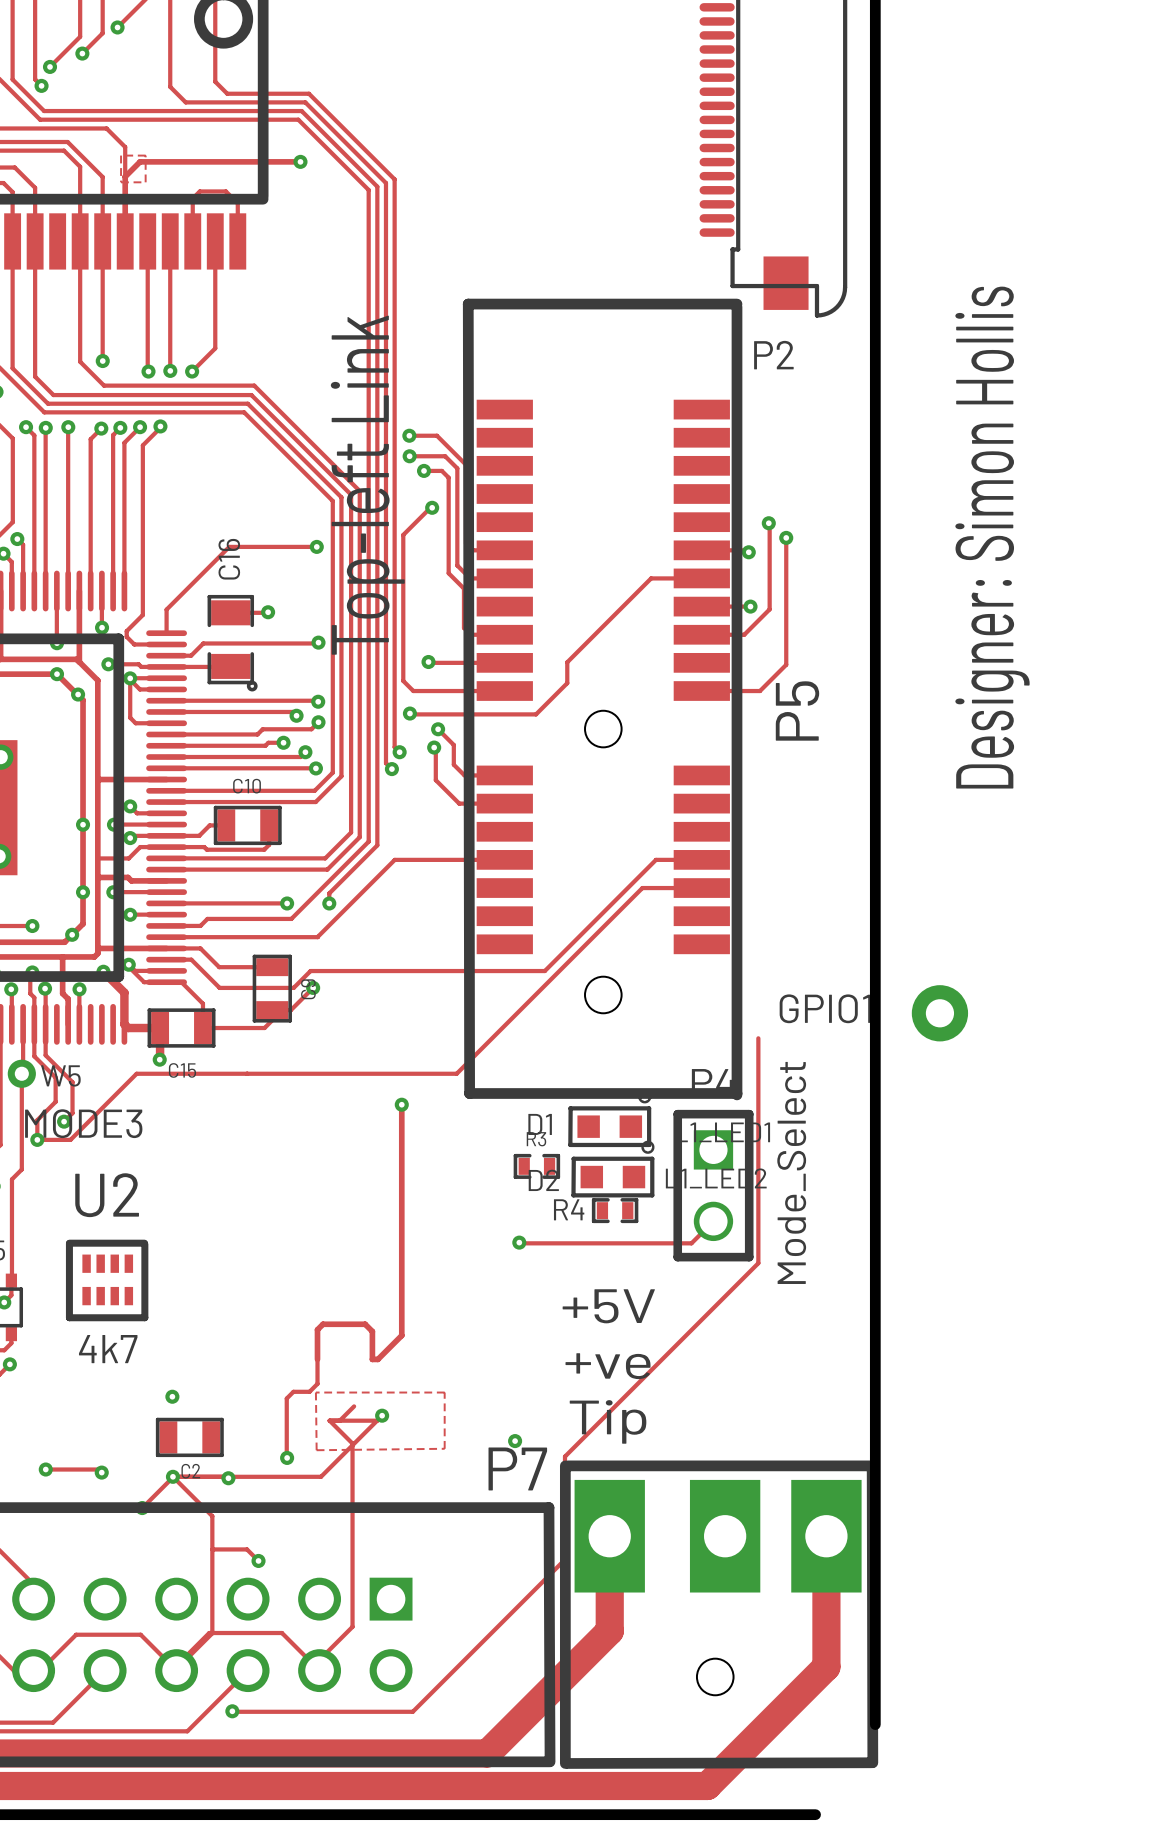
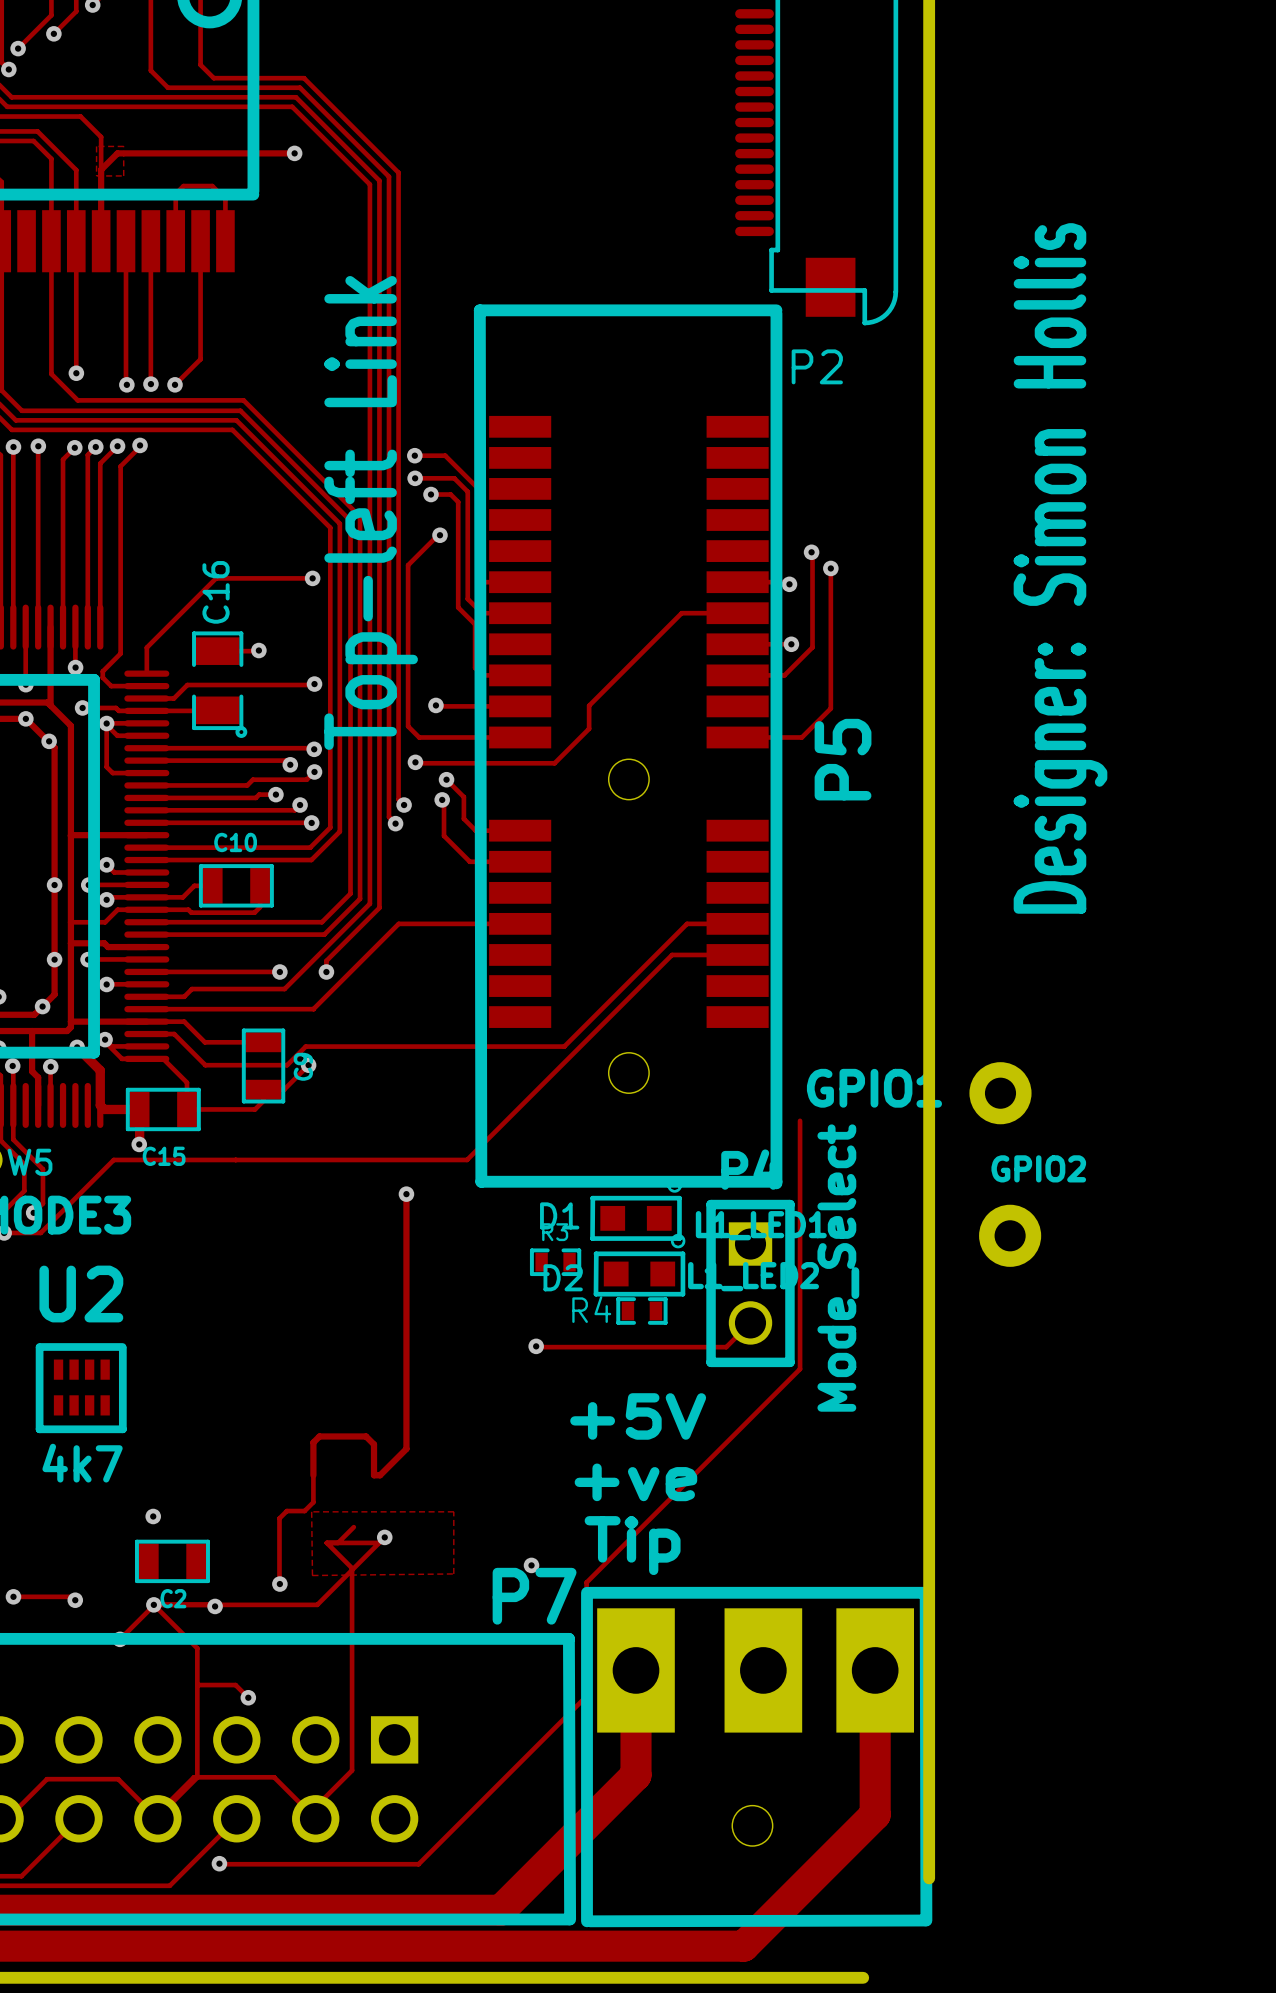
part: none -> GPIO2 (1010, 1235)

